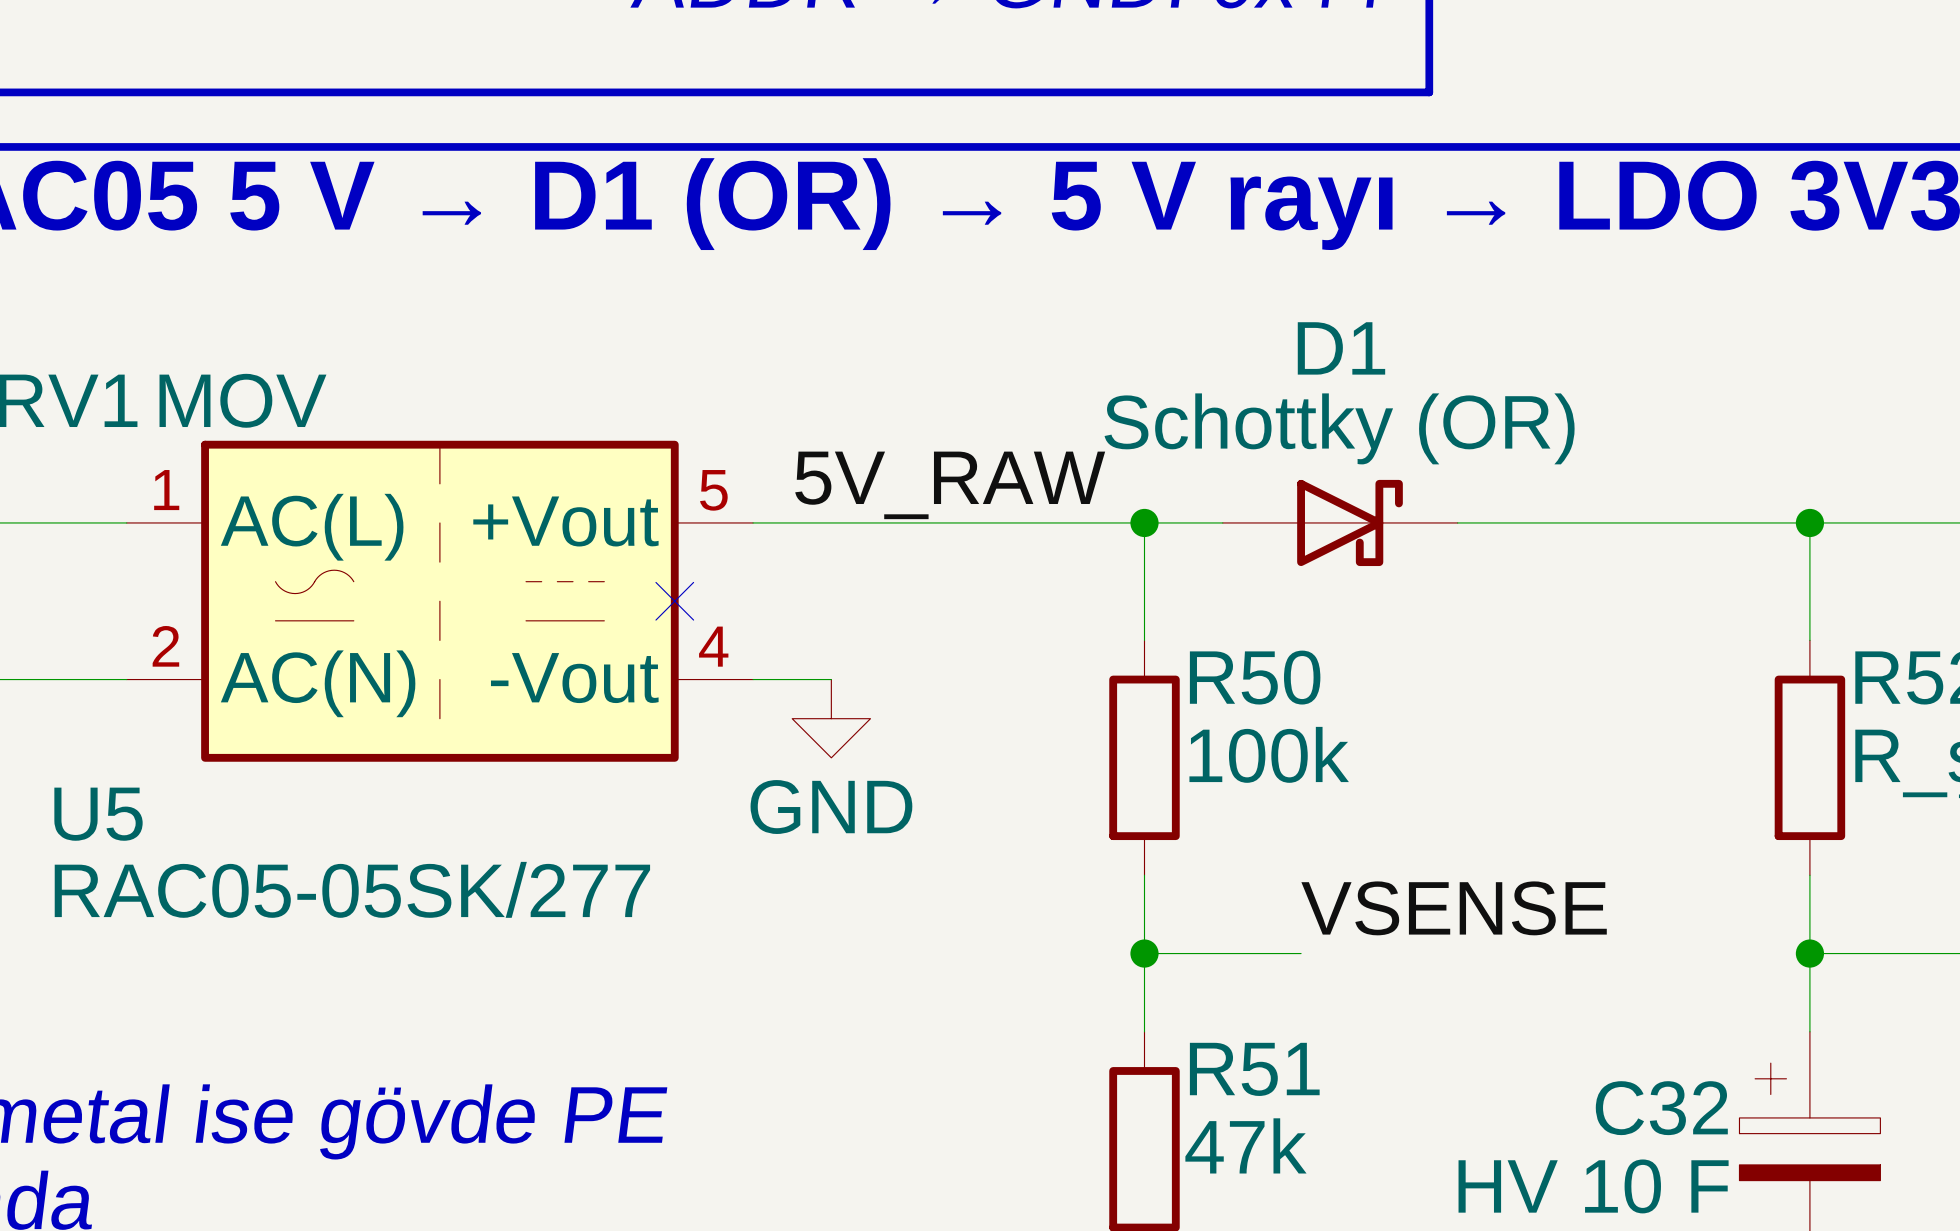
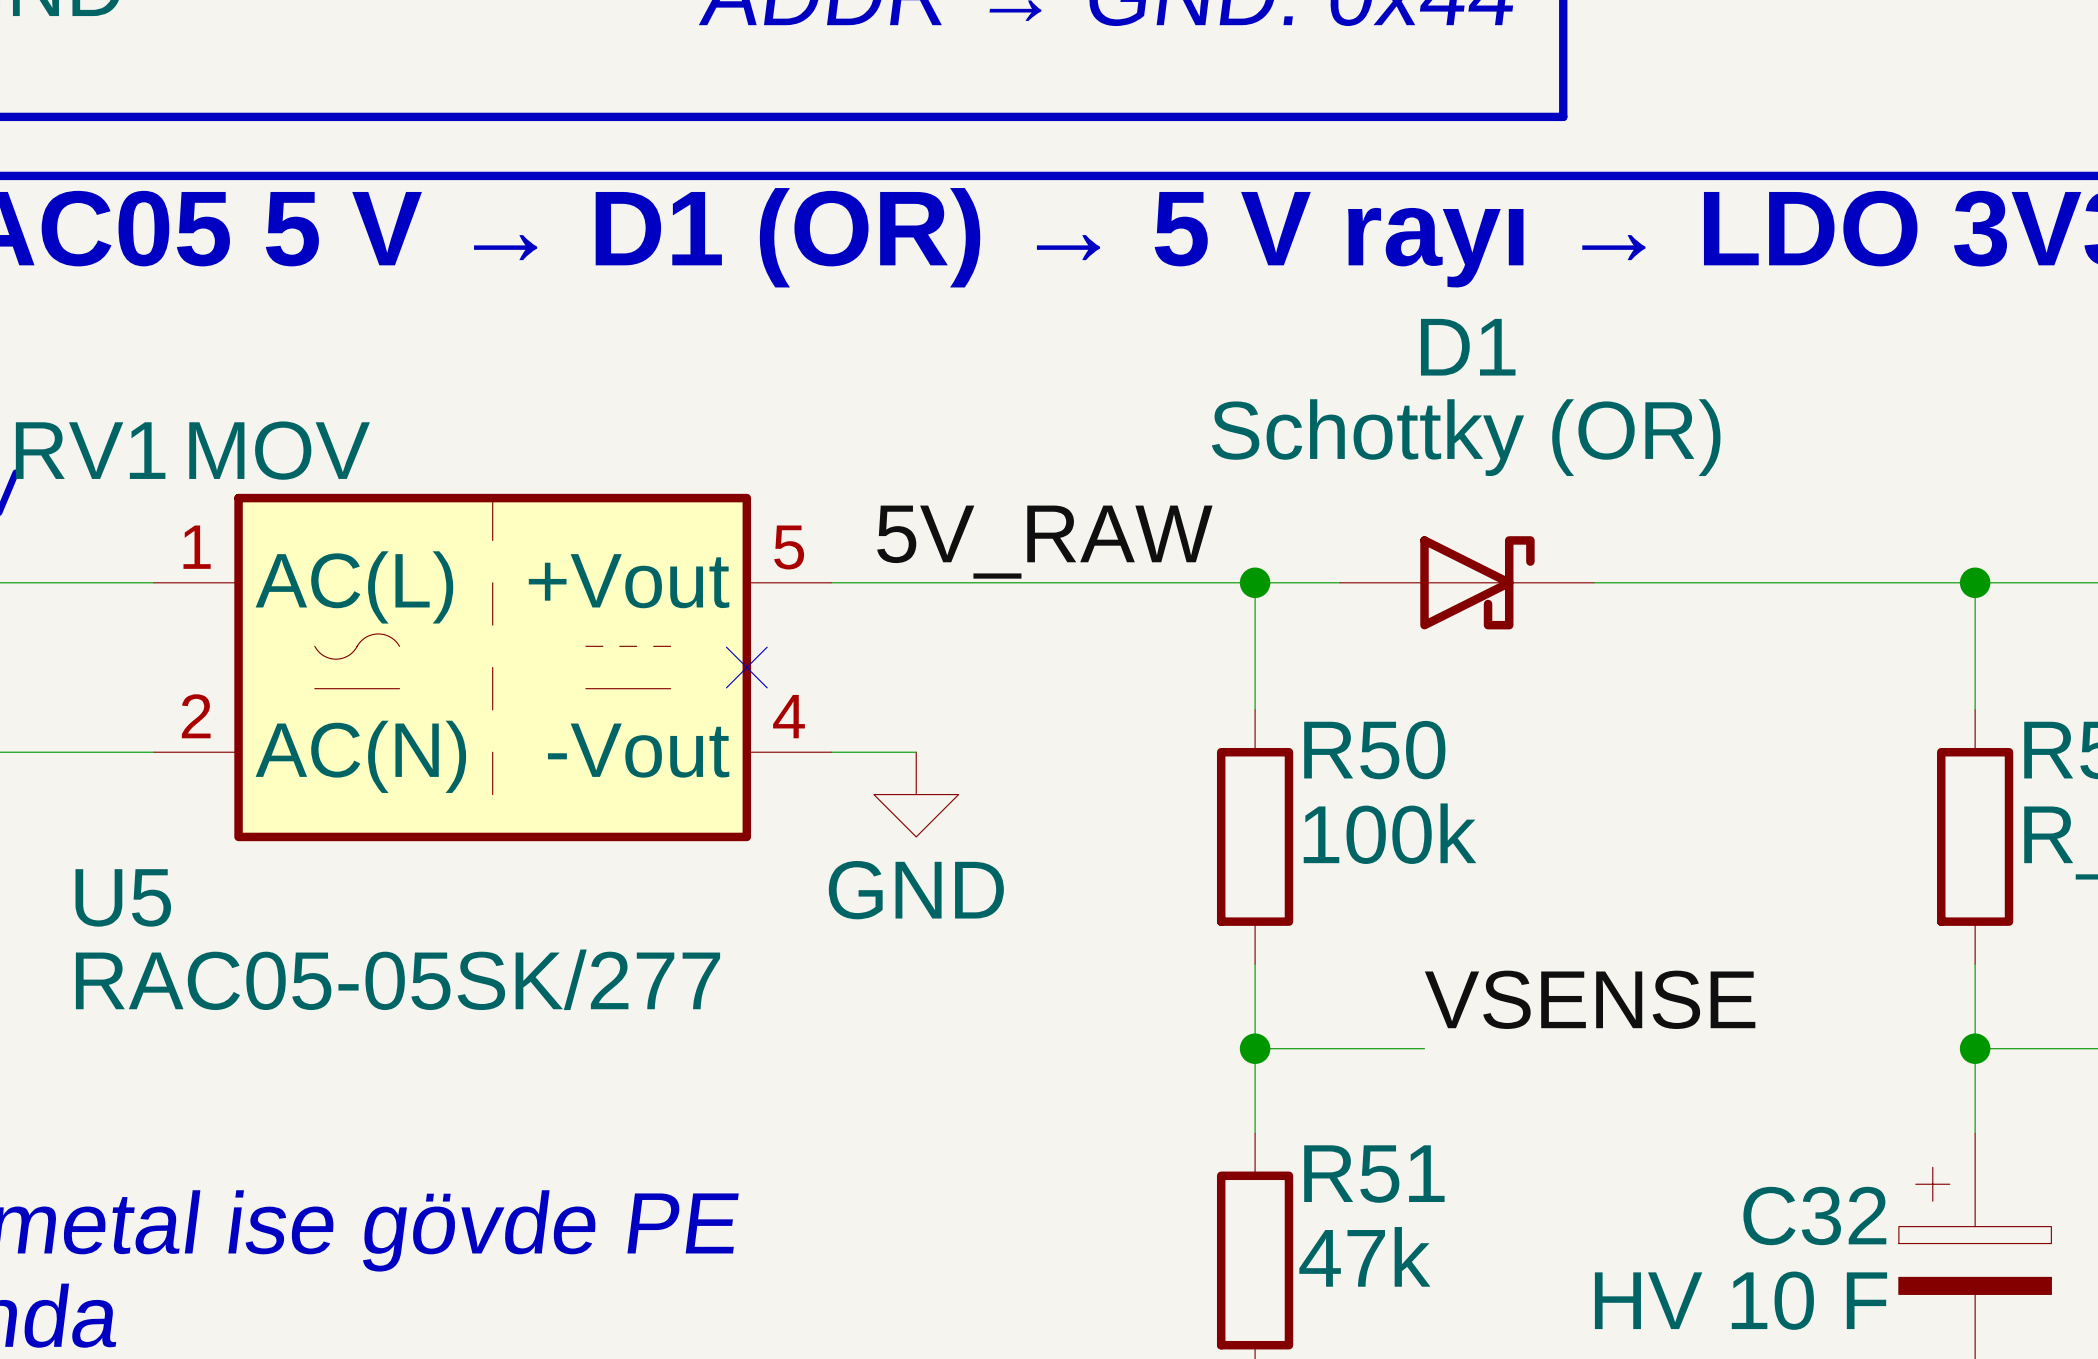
D1 name position: D1 (1341, 348) -> D1 (1468, 347)
D1 value position: Schottky (OR) (1339, 428) -> Schottky (OR) (1466, 437)

